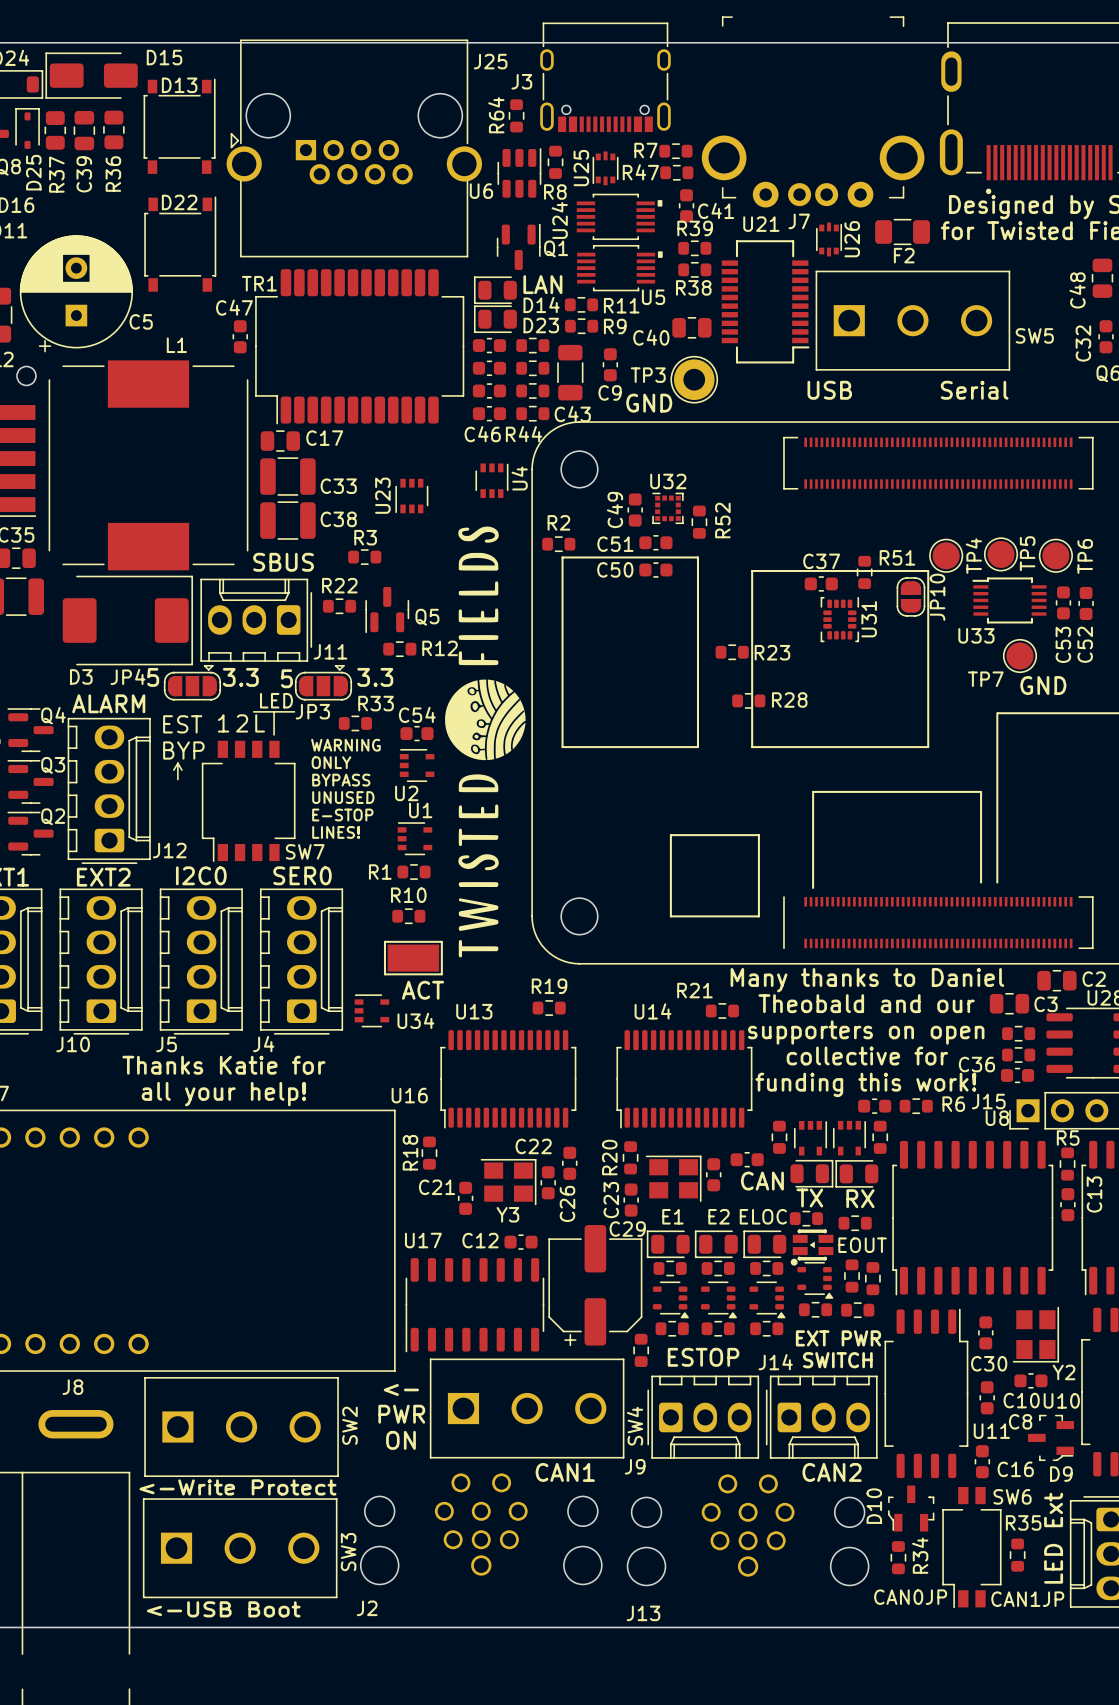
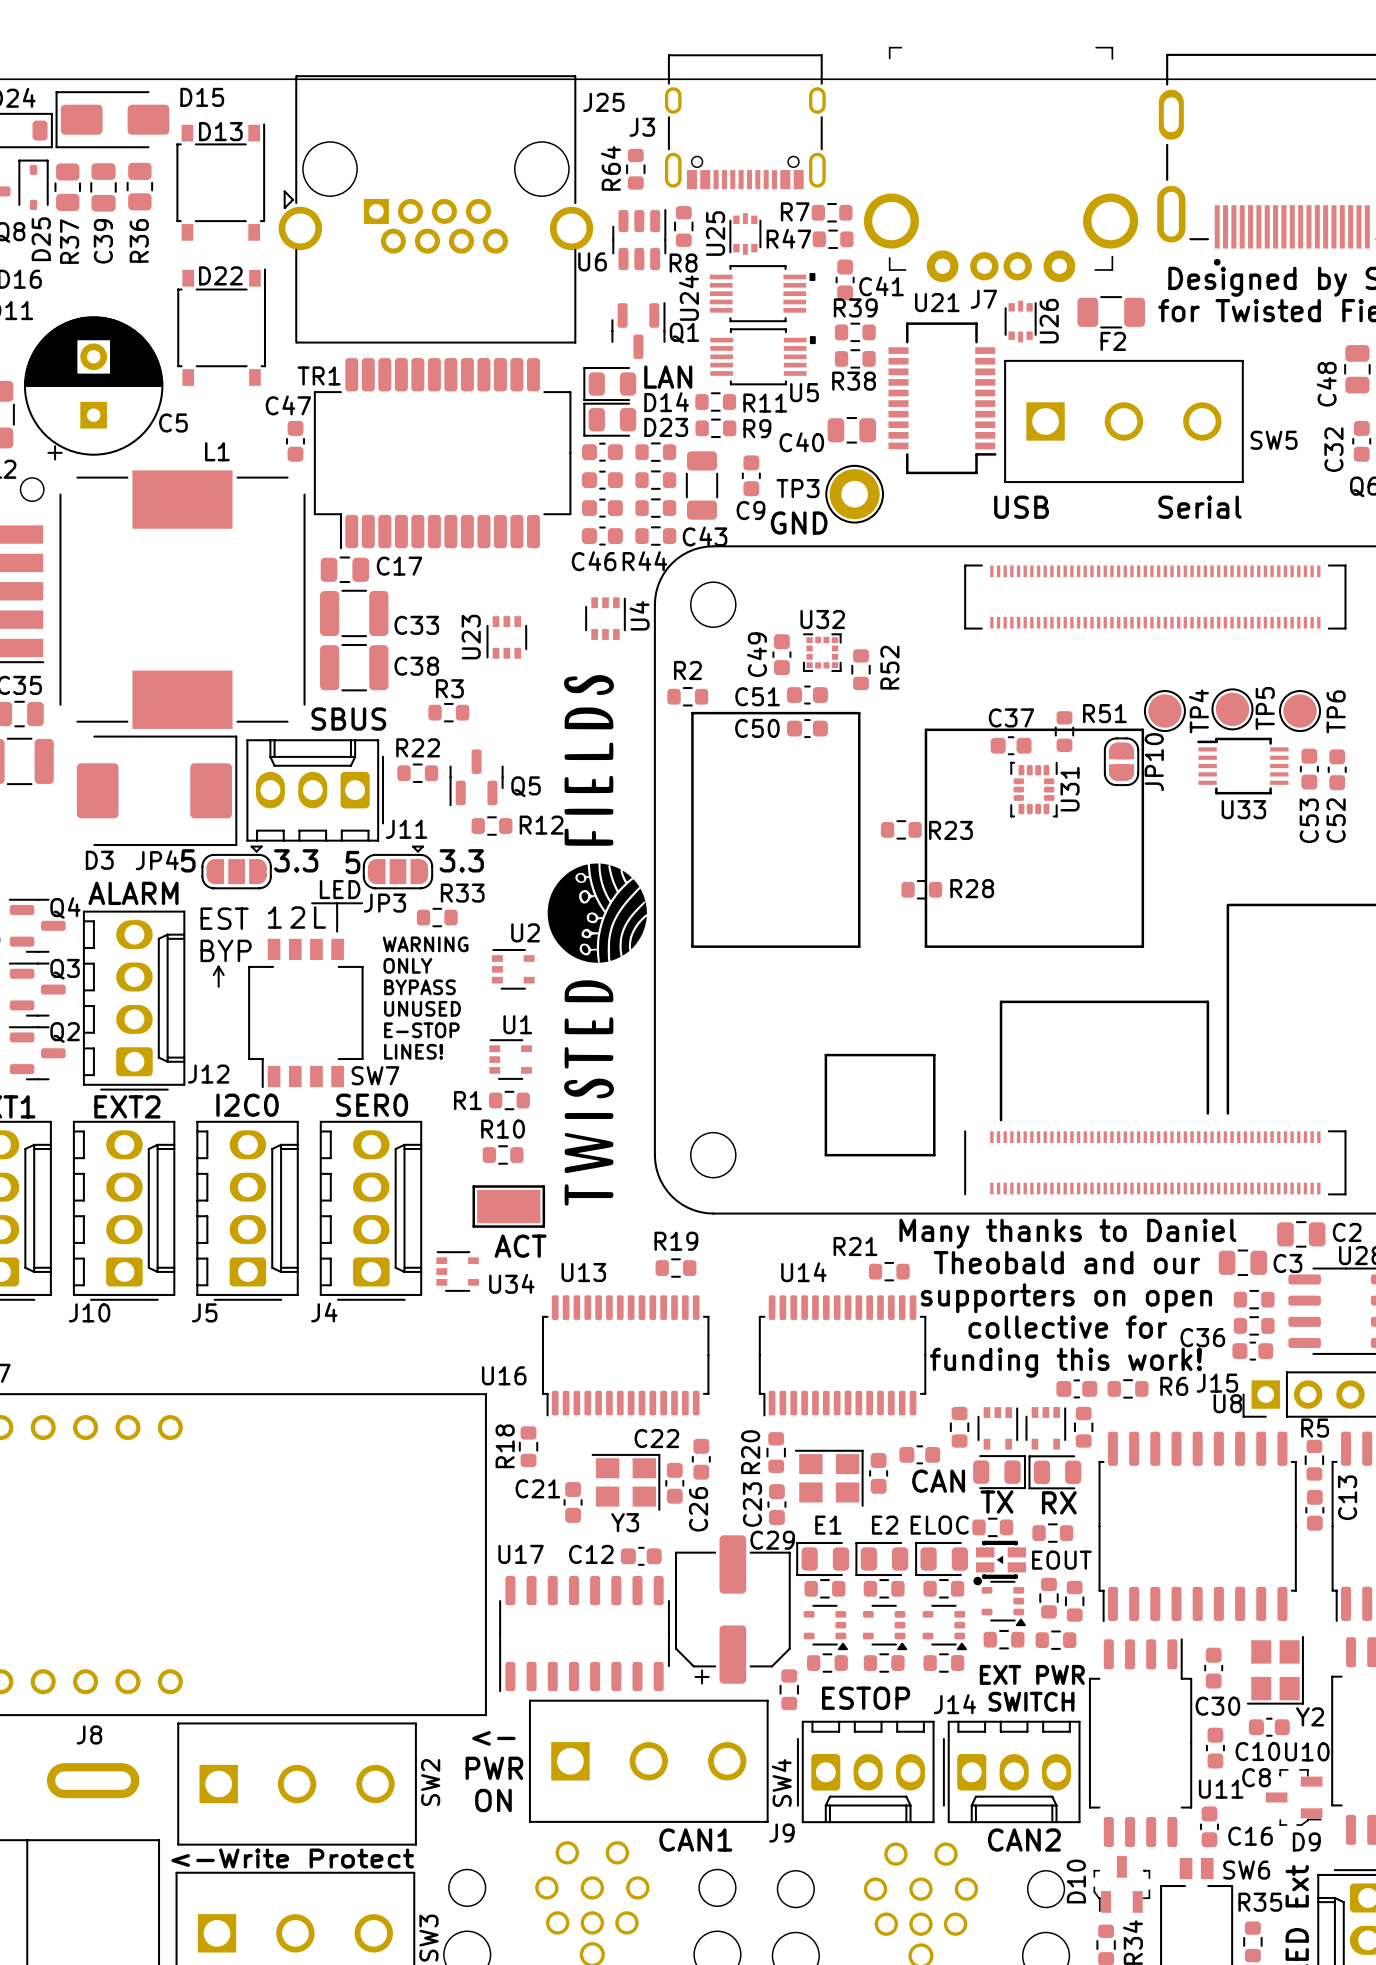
U33 name position: U33 (976, 635) -> U33 (1243, 809)
TP7: (1019, 656) -> none
text: GND (1043, 685) -> none
C54: (417, 733) -> none
U2 name position: U2 (406, 793) -> U2 (525, 932)
text: Thanks Katie for (223, 1065) -> none
text: all your help! (223, 1094) -> none

